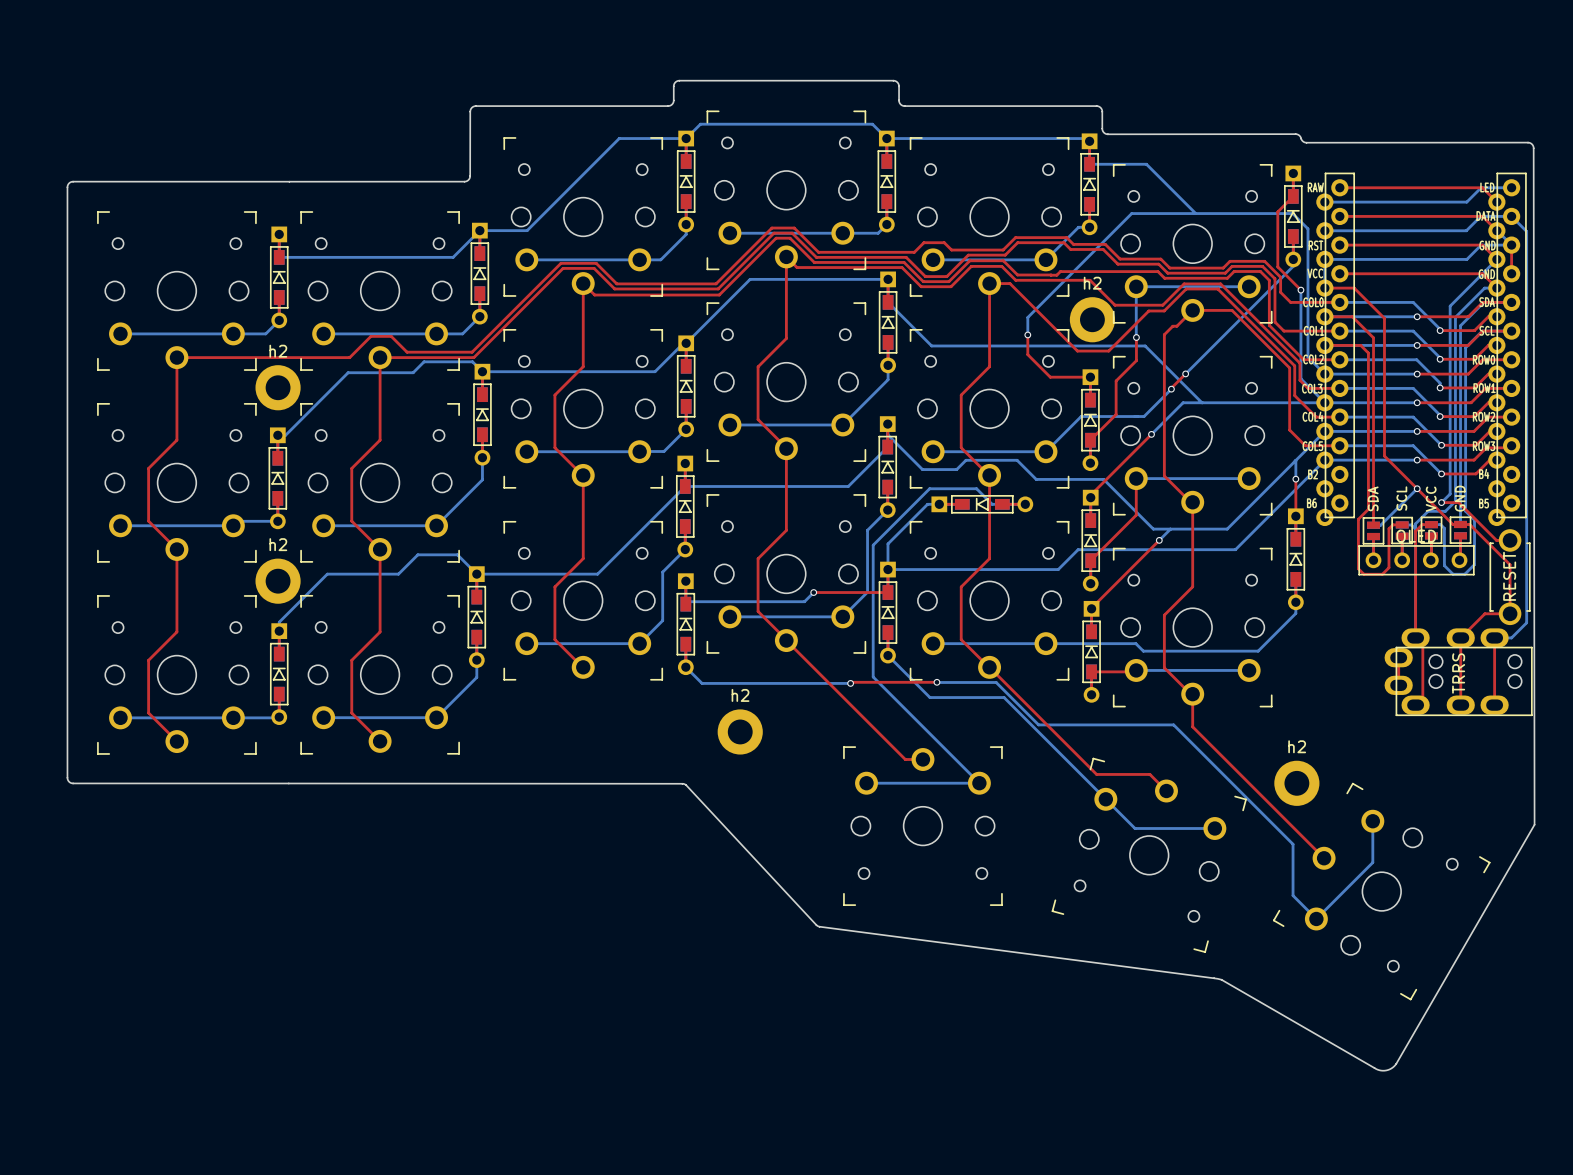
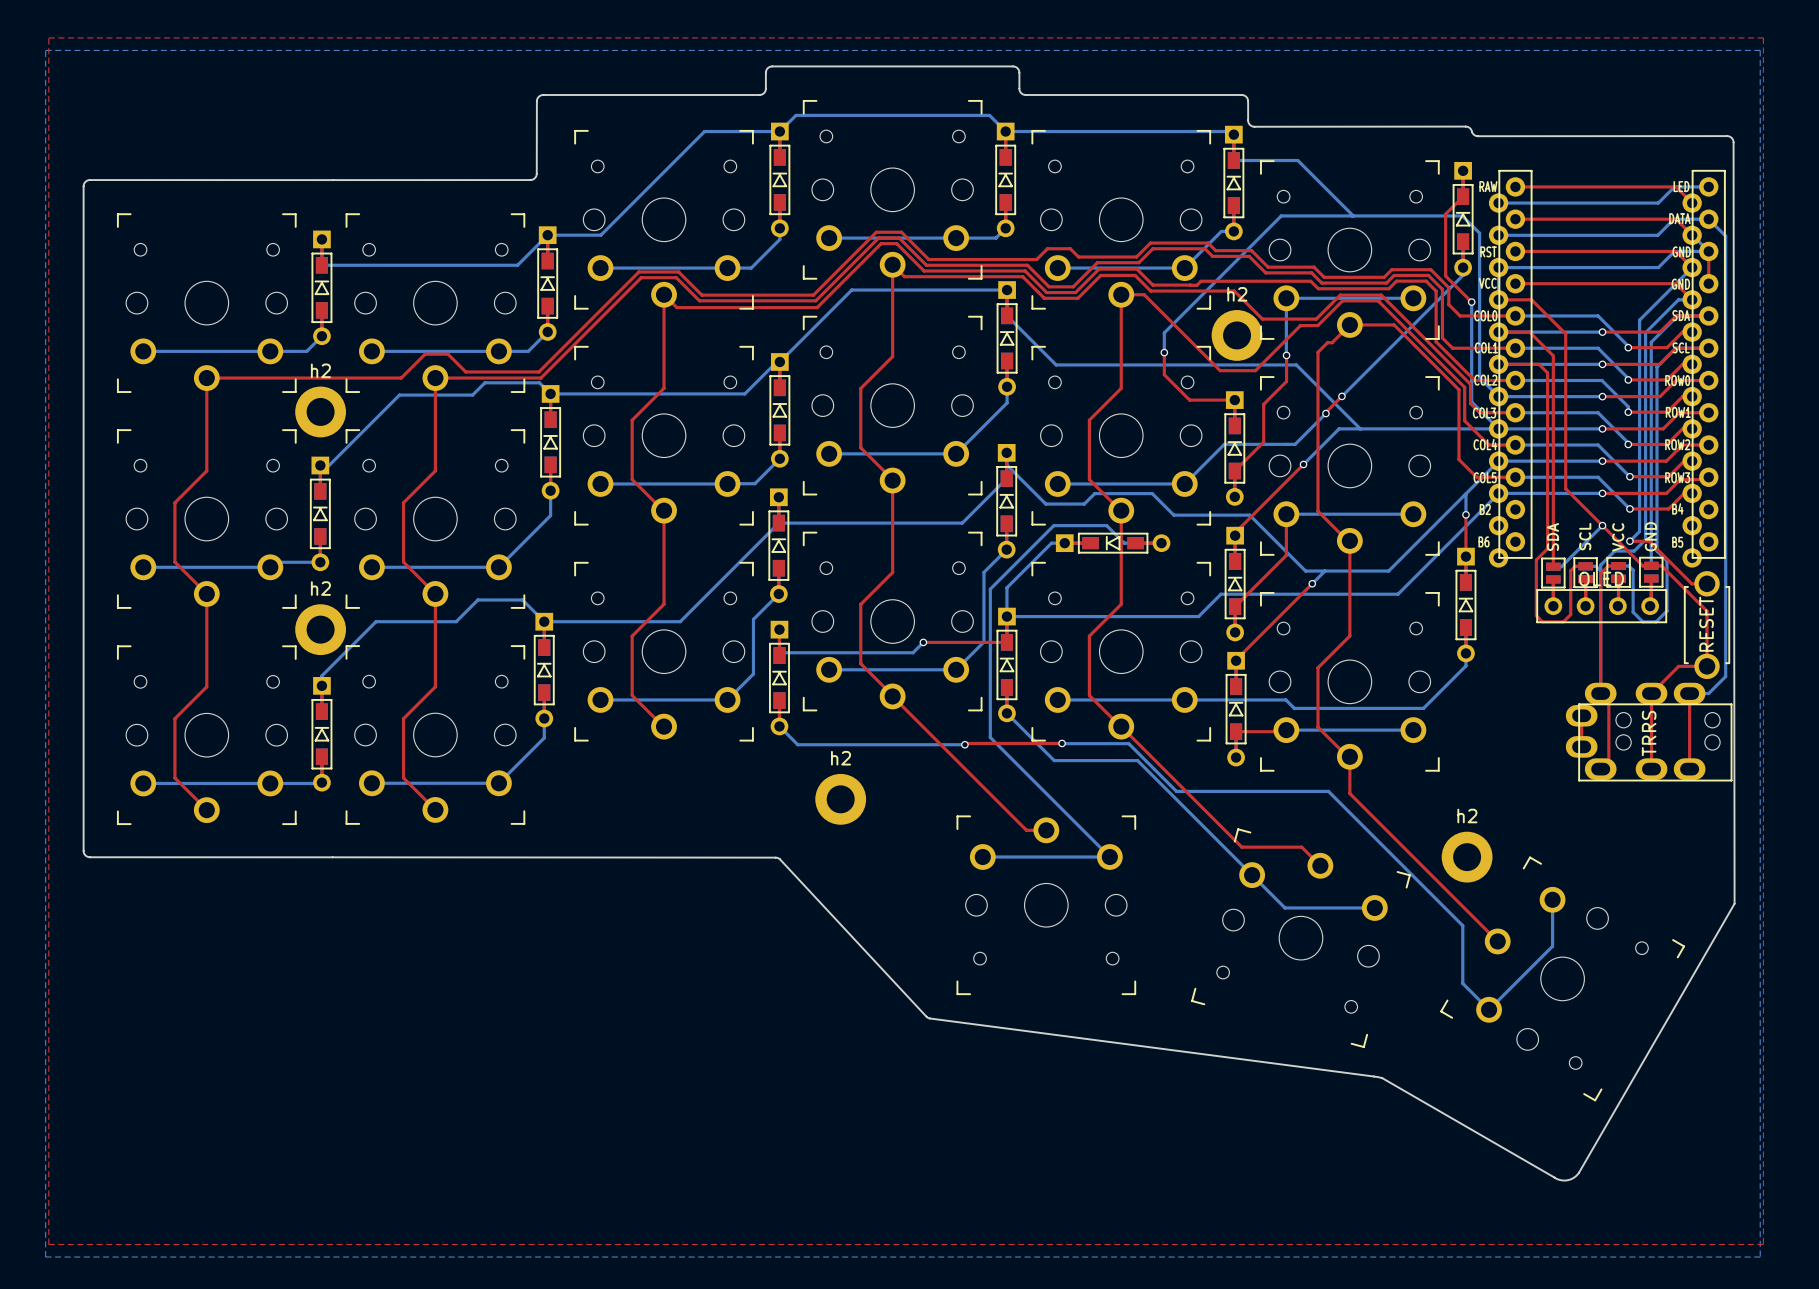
top zone outline: none -> (48, 37) (48, 1244) (1763, 1244) (1763, 37) (48, 37)
bottom zone outline: none -> (45, 50) (45, 1257) (1760, 1257) (1760, 50) (45, 50)

